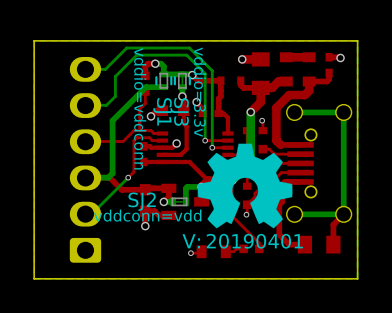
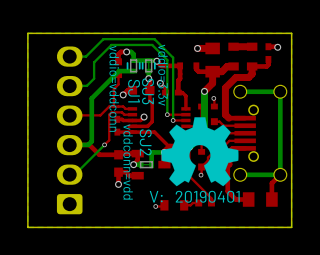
SJ2 name rotation: 0° (142, 201) -> 90° clockwise (145, 142)
SJ2 value rotation: 0° (147, 215) -> 90° clockwise (128, 162)

